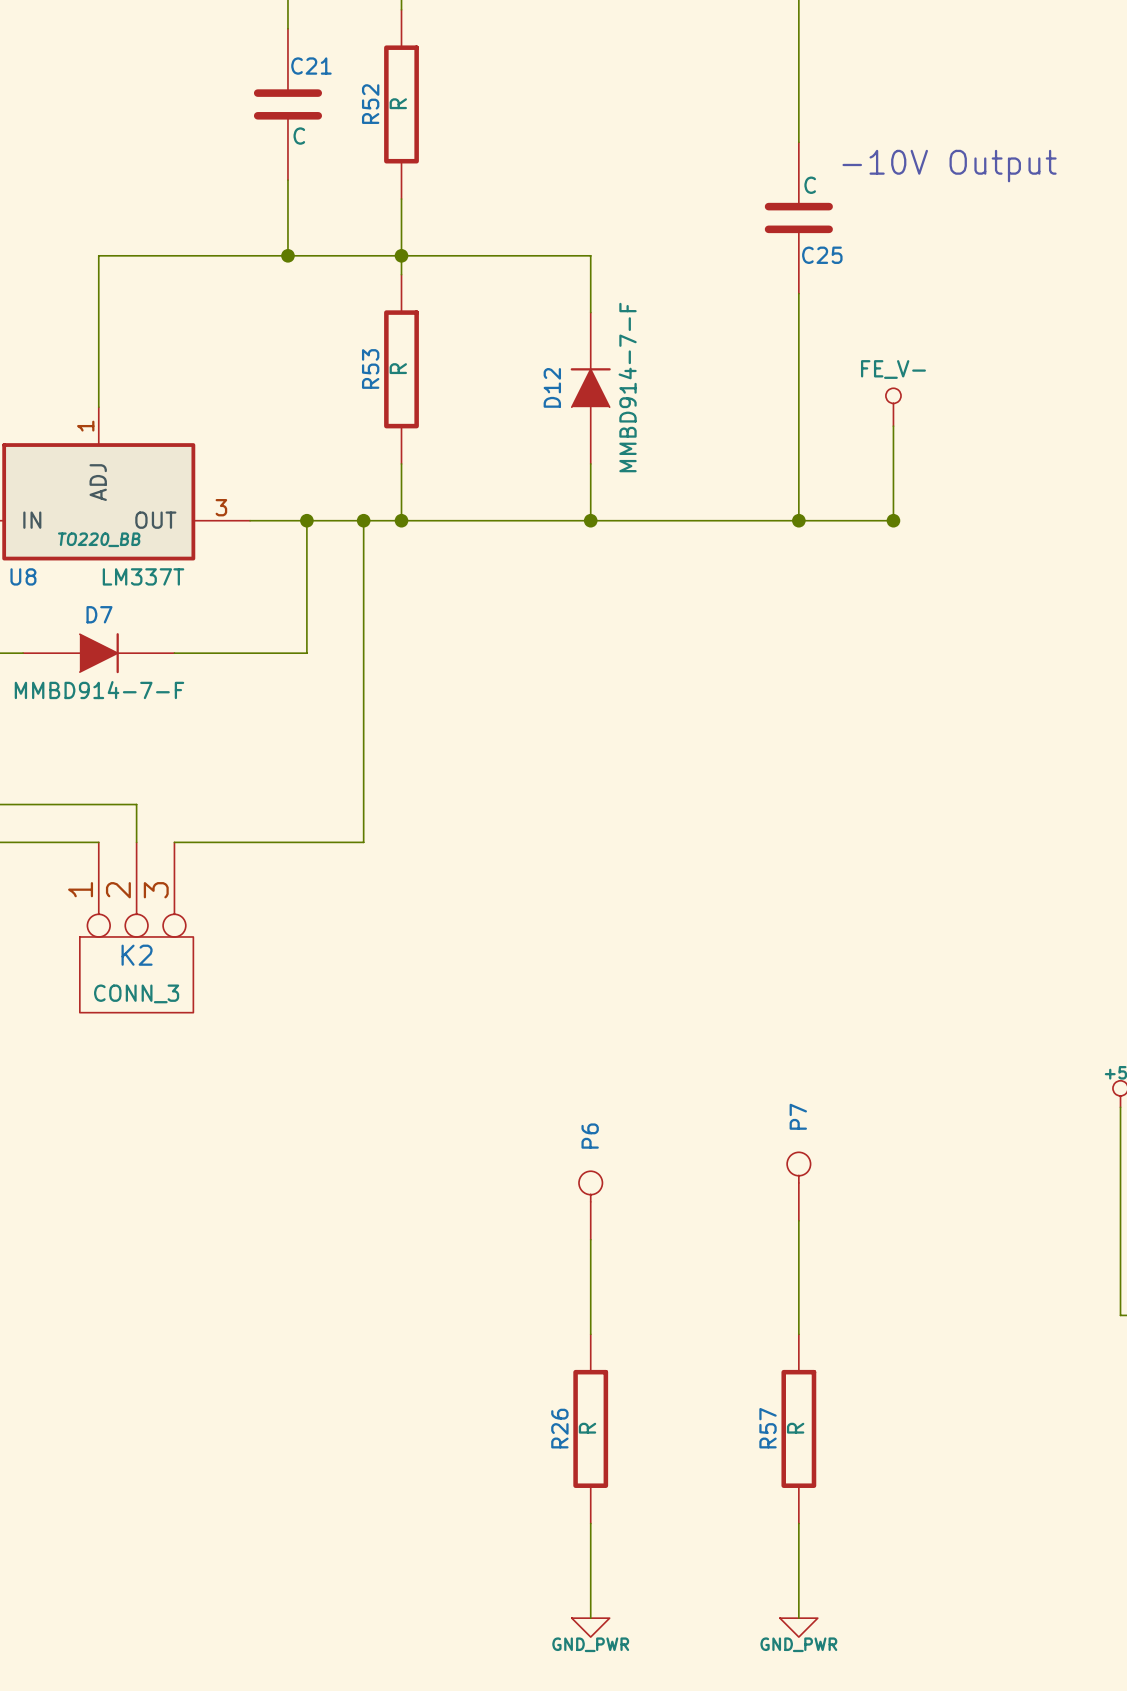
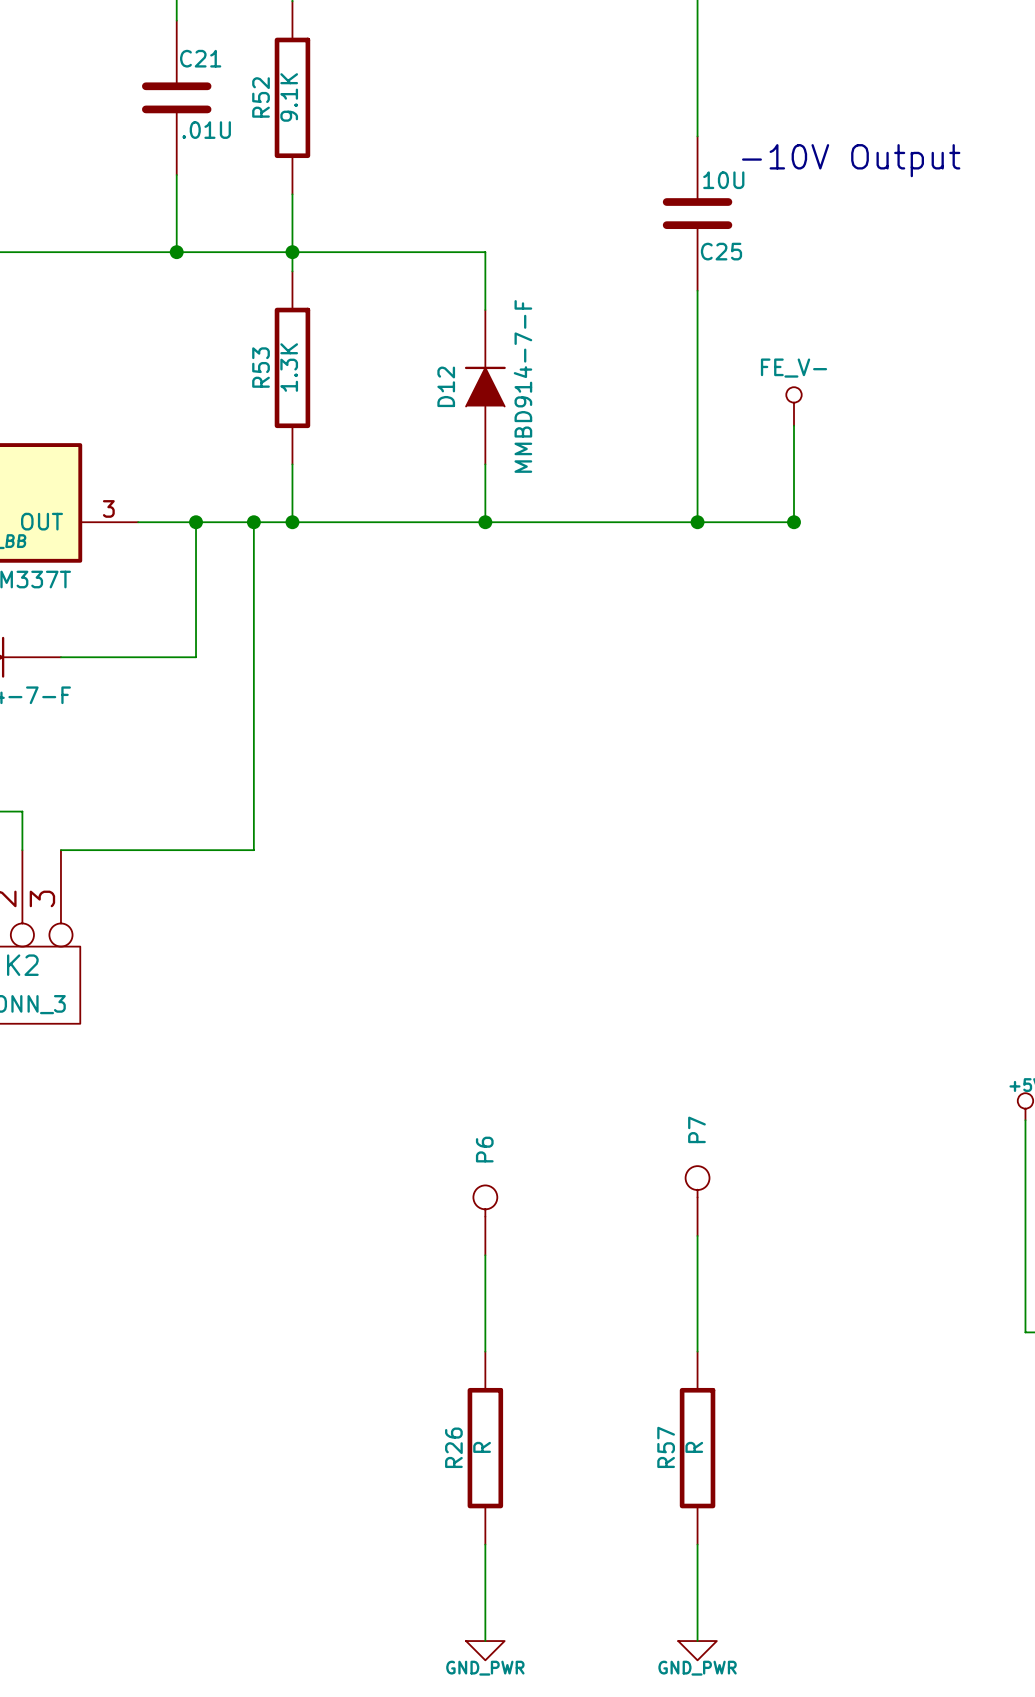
R52 value: R (398, 103) -> 9.1K (289, 97)
C21 value: C (299, 136) -> .01U (206, 130)
C25 value: C (810, 185) -> 10U (723, 180)
R53 value: R (398, 368) -> 1.3K (289, 367)

